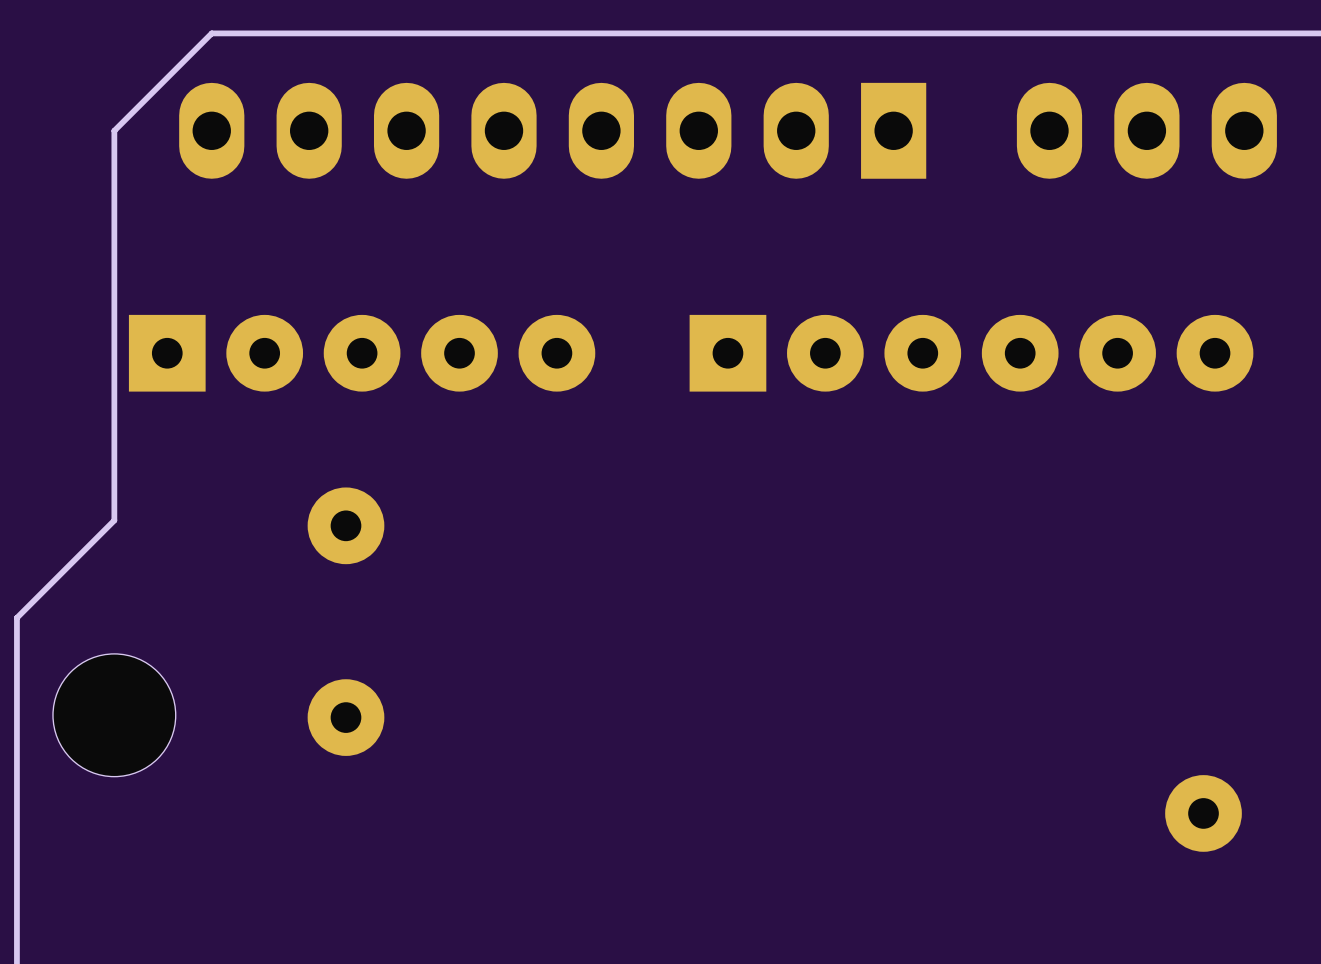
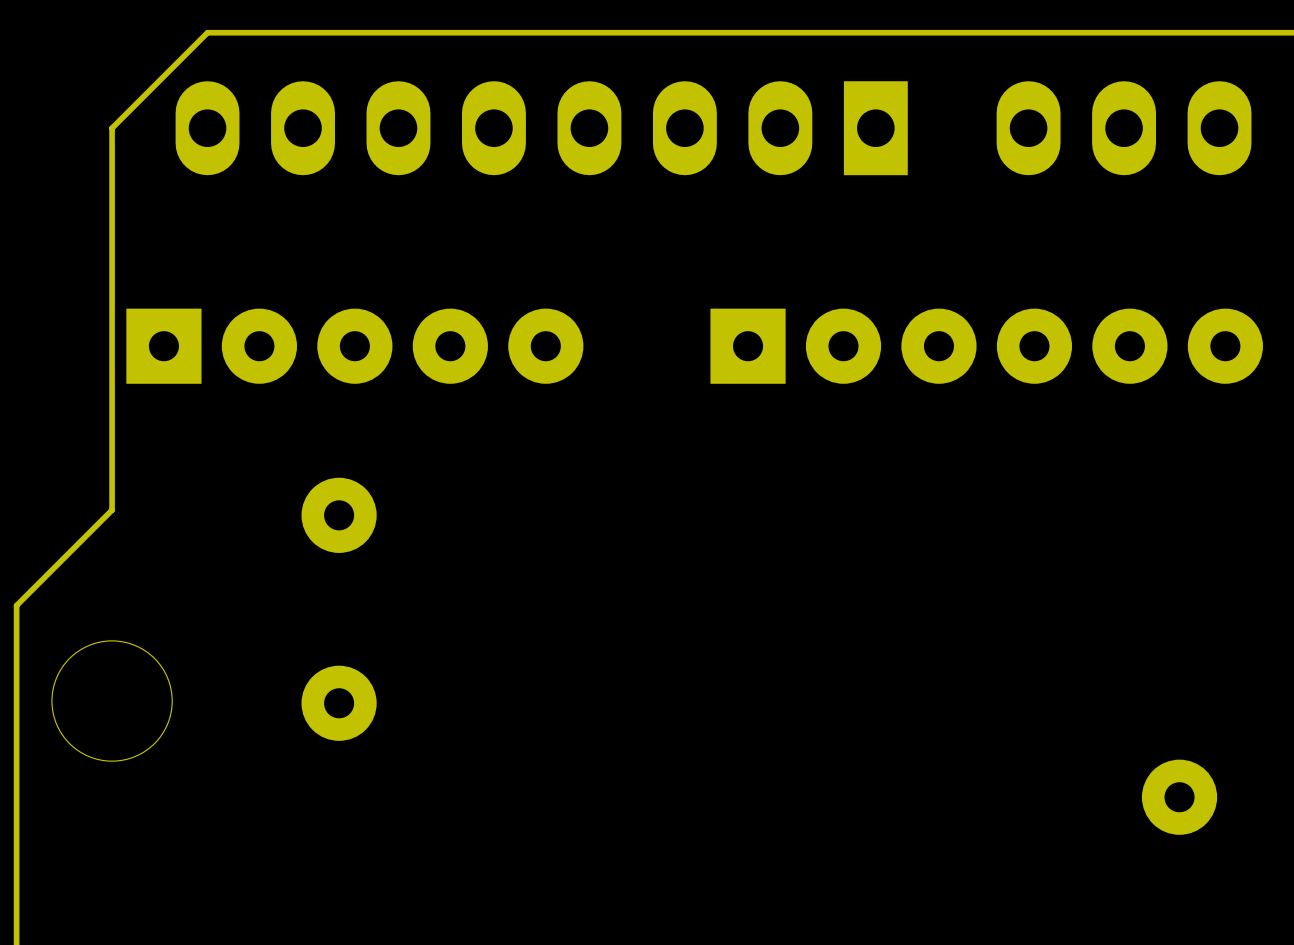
part position: (971, 353) -> (986, 346)

